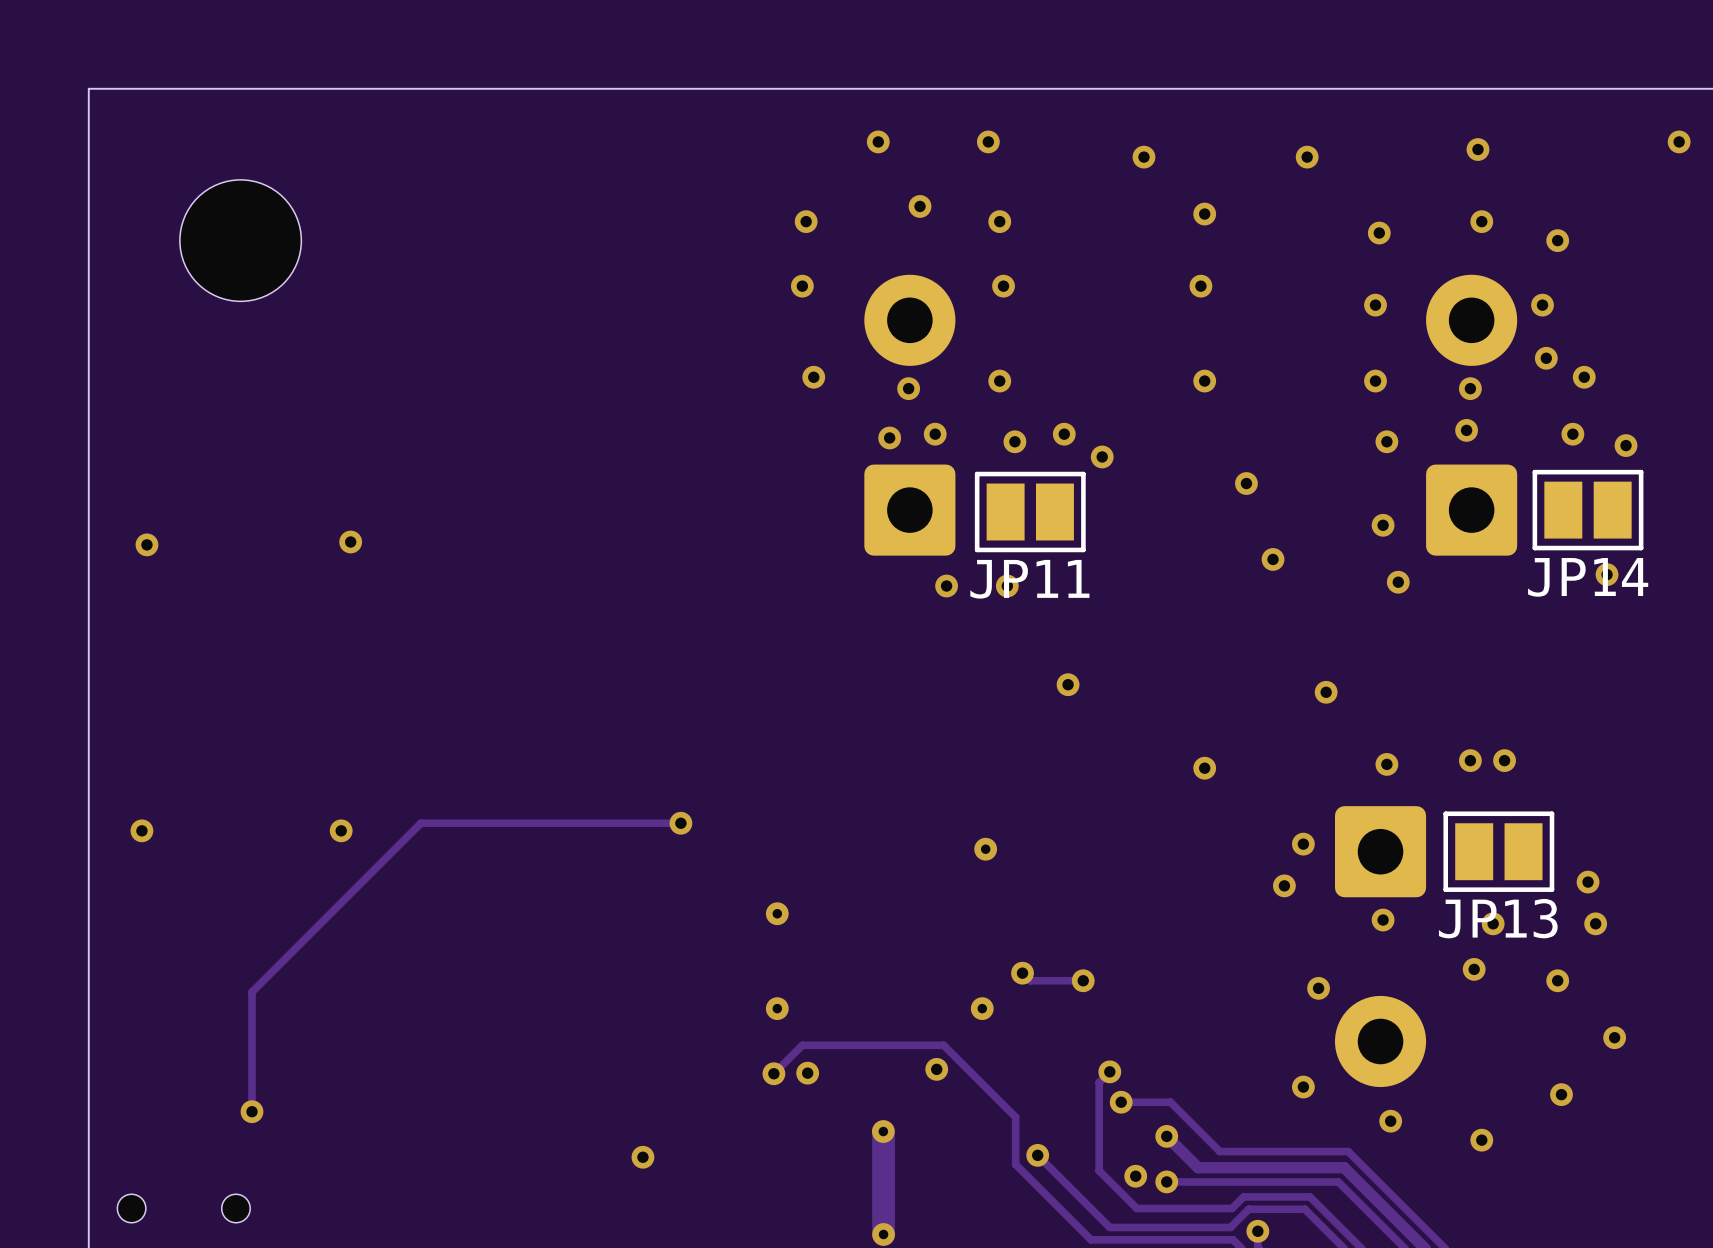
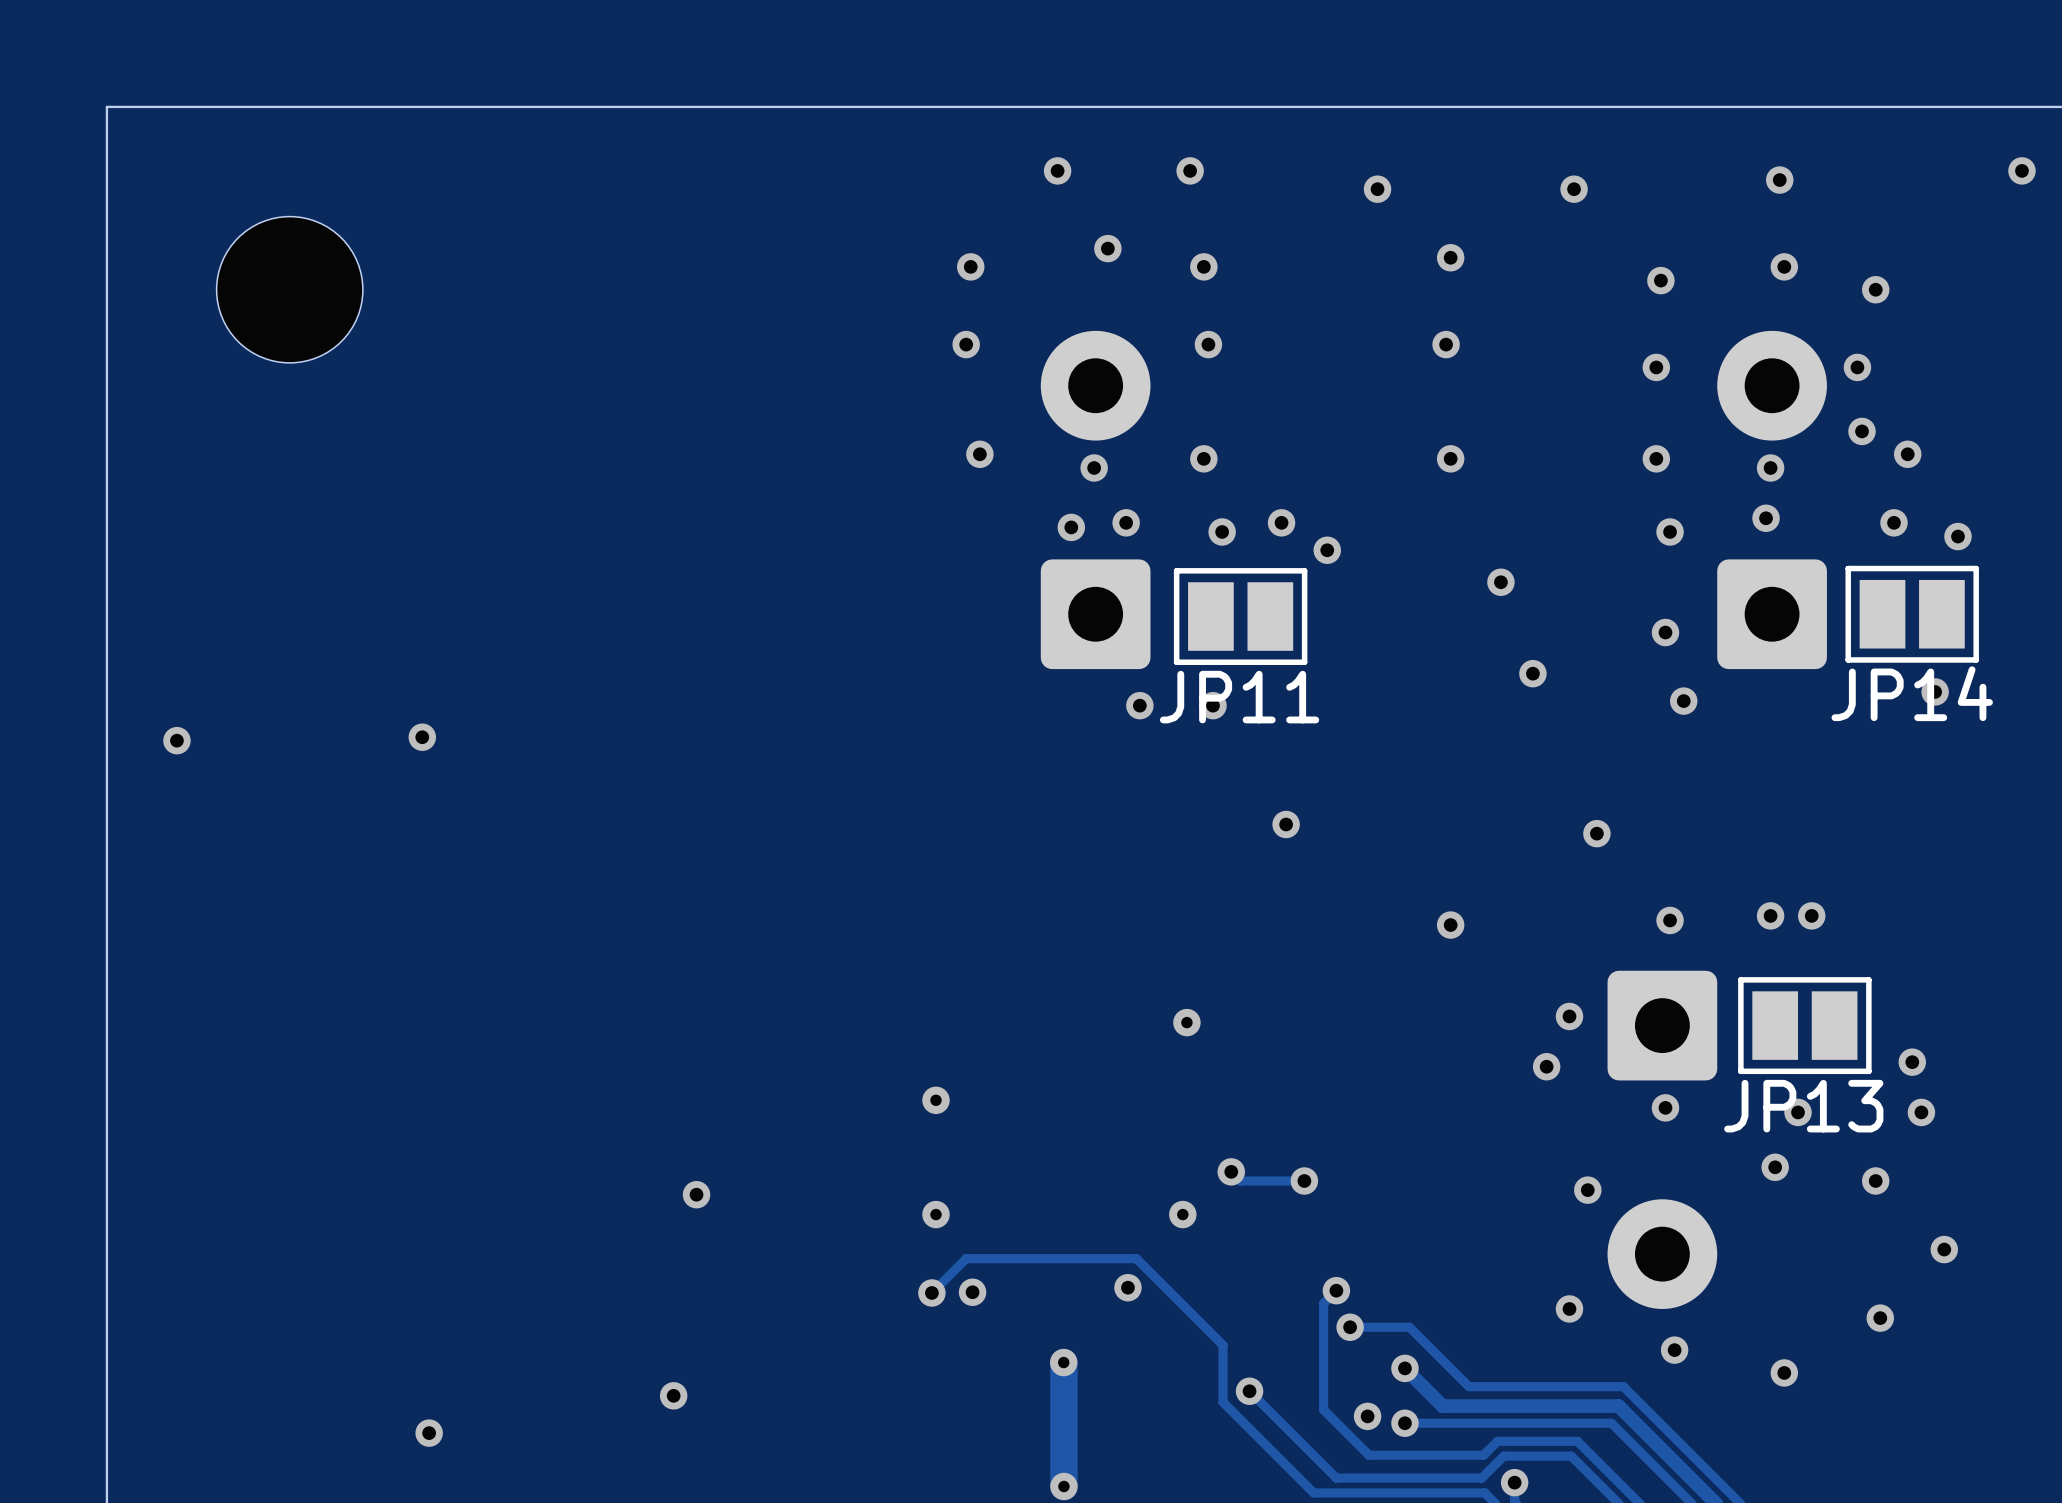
via position: (350, 542) -> (422, 737)
via position: (146, 544) -> (176, 740)
track: (680, 823) (420, 823) (252, 992) (252, 1111) -> none
via: (680, 823) -> none
via: (141, 830) -> none
via: (341, 830) -> none
via: none -> (696, 1194)
via position: (252, 1111) -> (429, 1433)
via position: (642, 1157) -> (673, 1395)
part: (183, 1208) -> none

